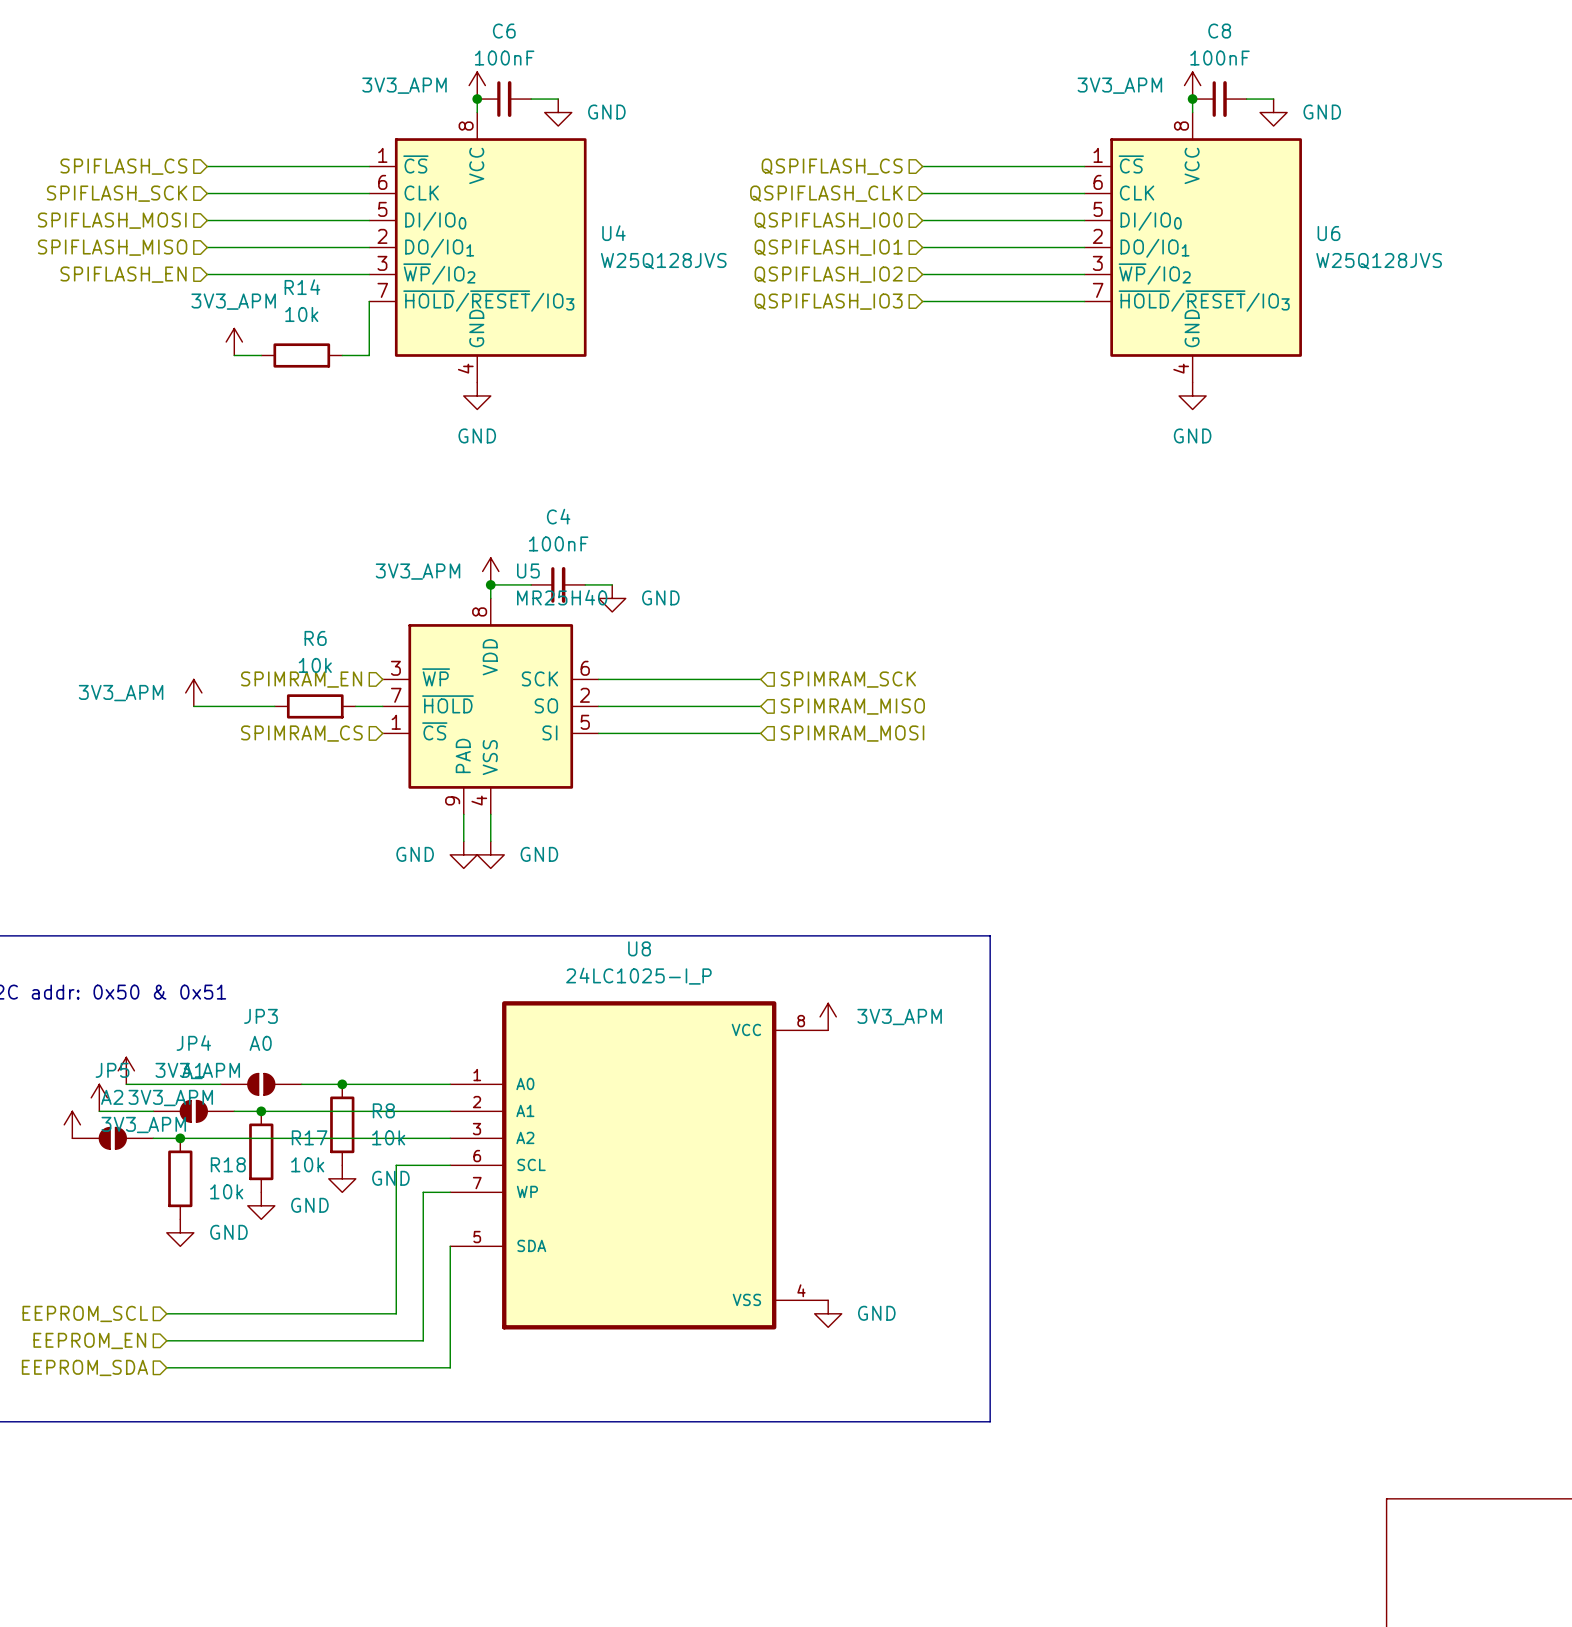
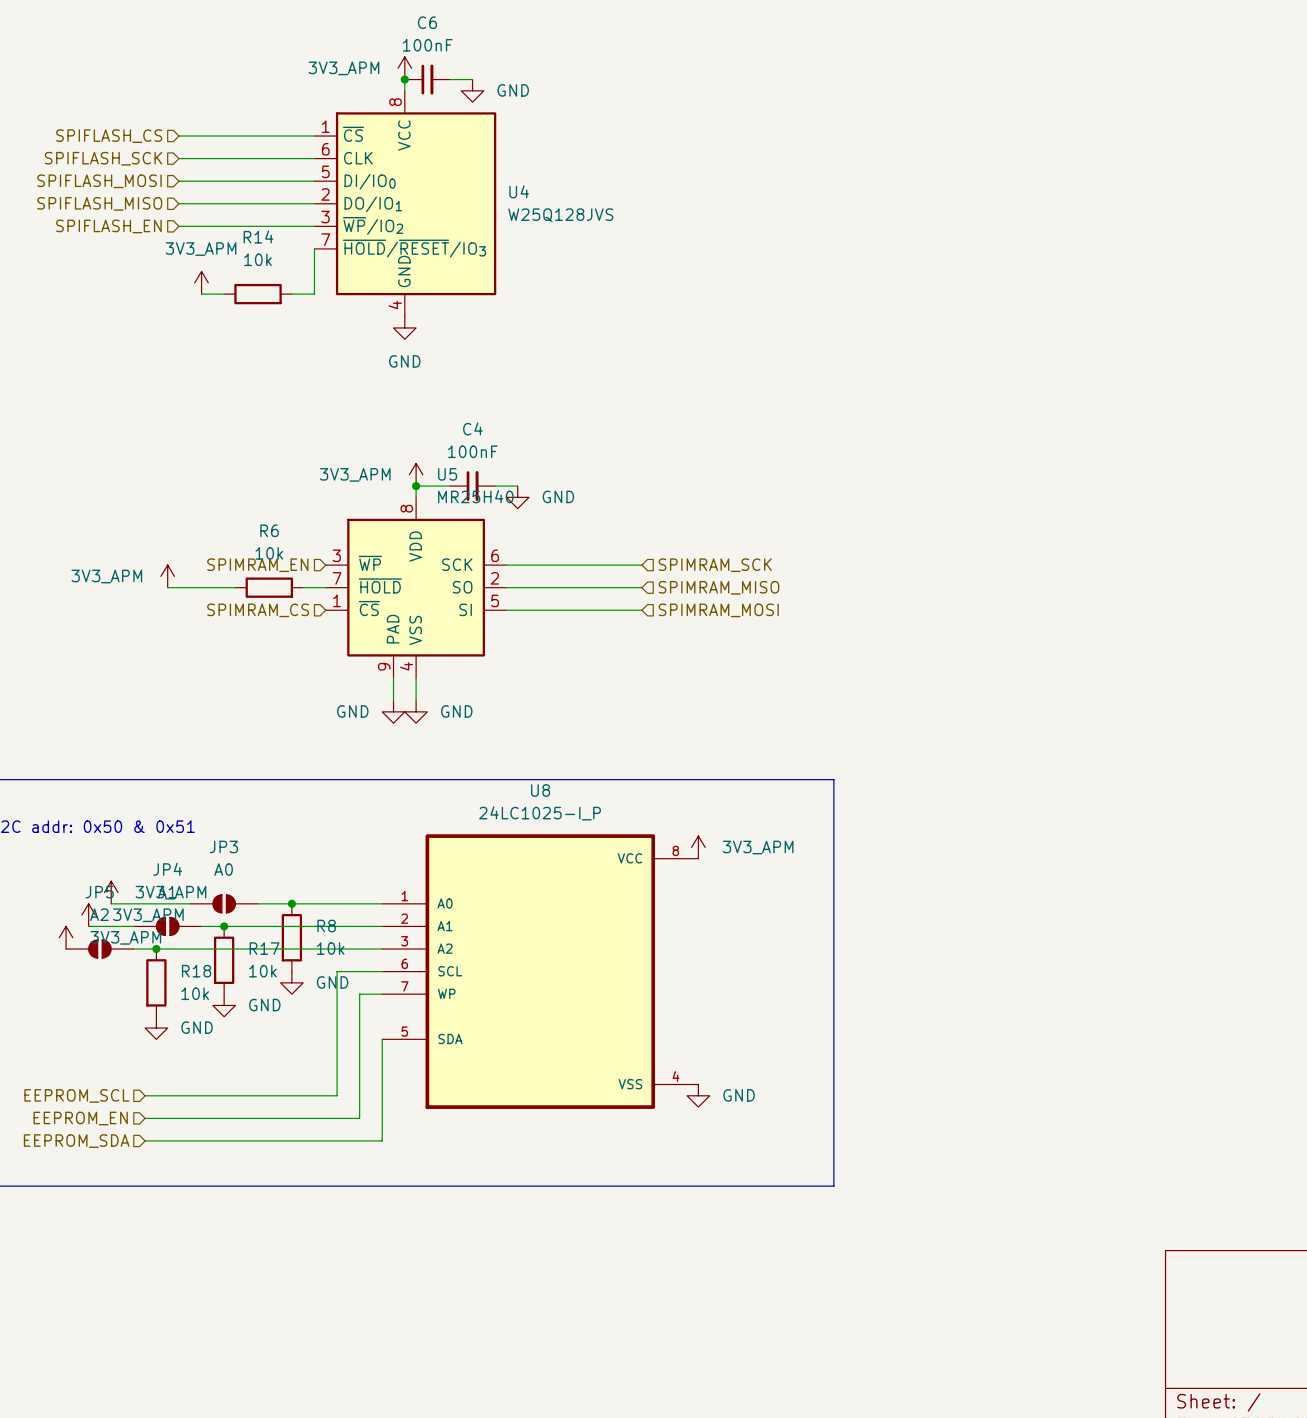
power symbol: 3V3_APM (1192, 85) -> none
wire: (1192, 99) (1192, 112) -> none
junction: (1192, 99) -> none
C8: 100nF (1219, 99) -> none
wire: (1246, 99) (1273, 99) -> none
power symbol: GND (1273, 112) -> none
hierarchical label: QSPIFLASH_CS (832, 166) -> none
wire: (922, 166) (1084, 166) -> none
hierarchical label: QSPIFLASH_CLK (826, 193) -> none
wire: (922, 193) (1084, 193) -> none
hierarchical label: QSPIFLASH_IO0 (828, 220) -> none
wire: (922, 220) (1084, 220) -> none
hierarchical label: QSPIFLASH_IO1 (828, 247) -> none
wire: (922, 247) (1084, 247) -> none
U6: W25Q128JVS (1193, 247) -> none
hierarchical label: QSPIFLASH_IO2 (828, 274) -> none
wire: (922, 274) (1084, 274) -> none
hierarchical label: QSPIFLASH_IO3 (828, 301) -> none
wire: (922, 301) (1084, 301) -> none
power symbol: GND (1192, 395) -> none

